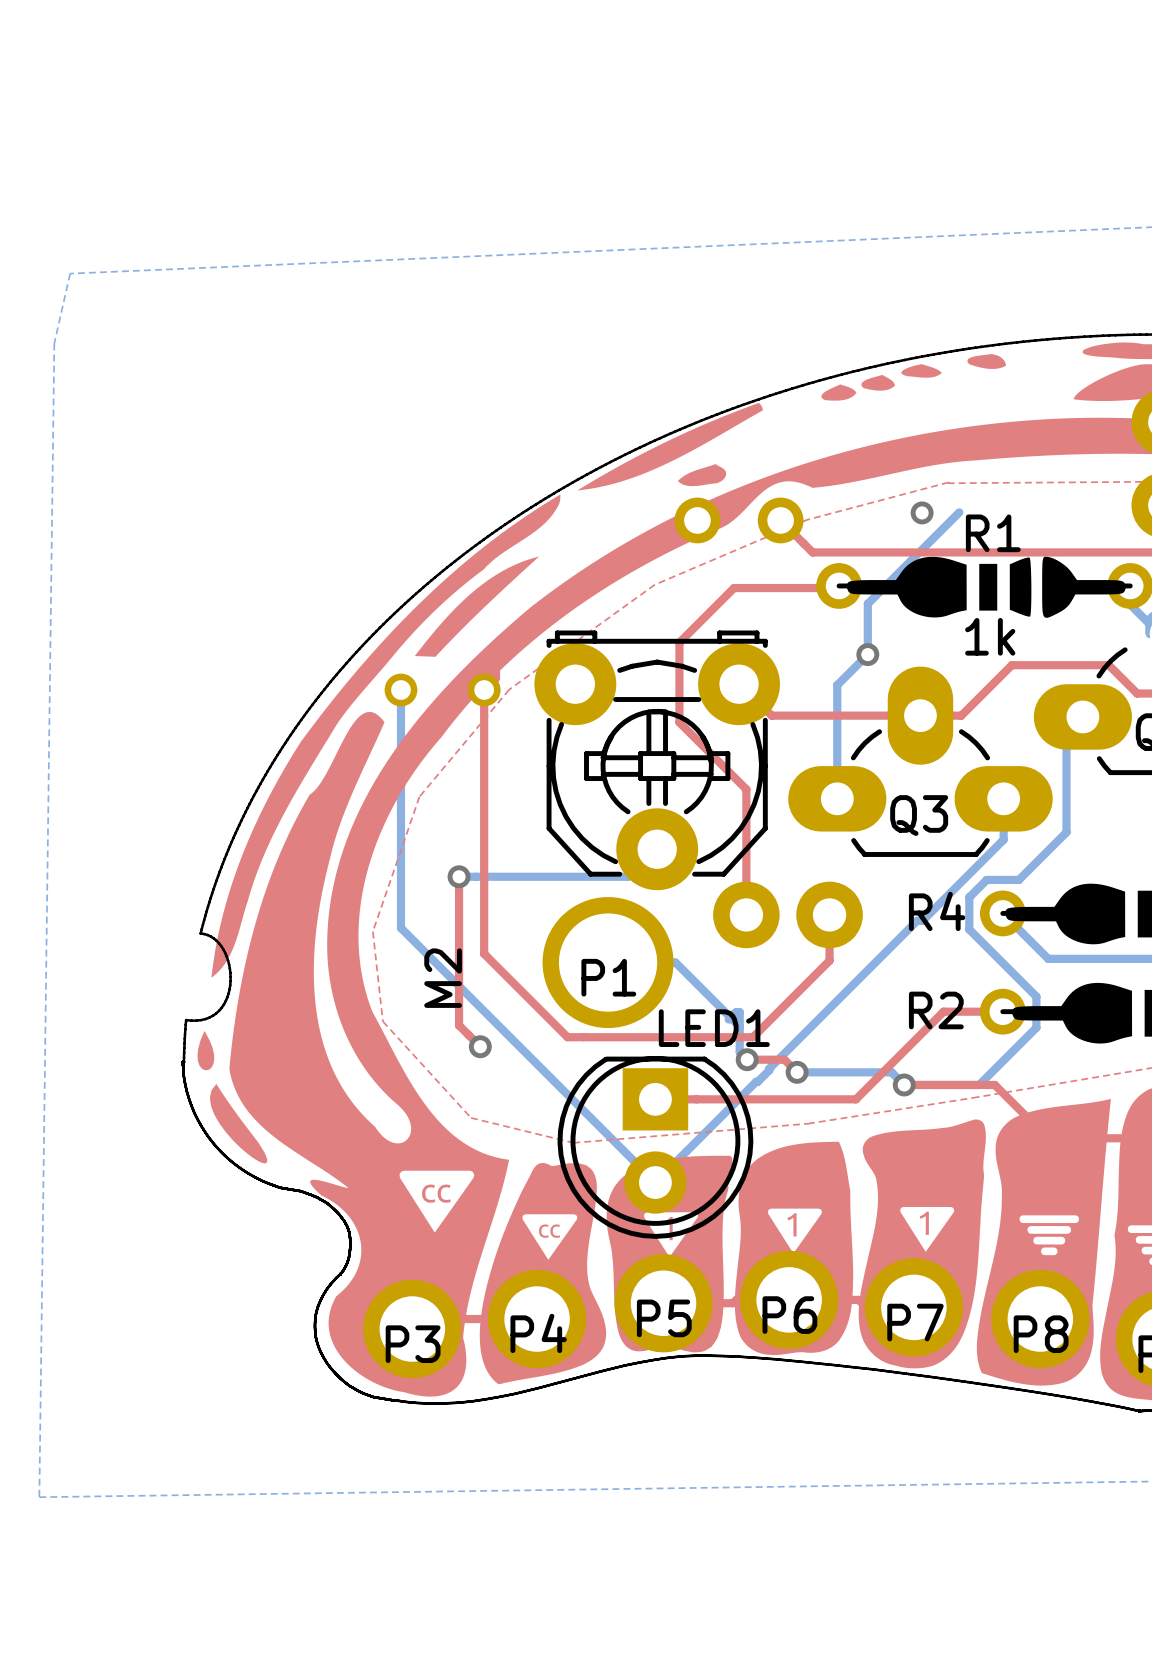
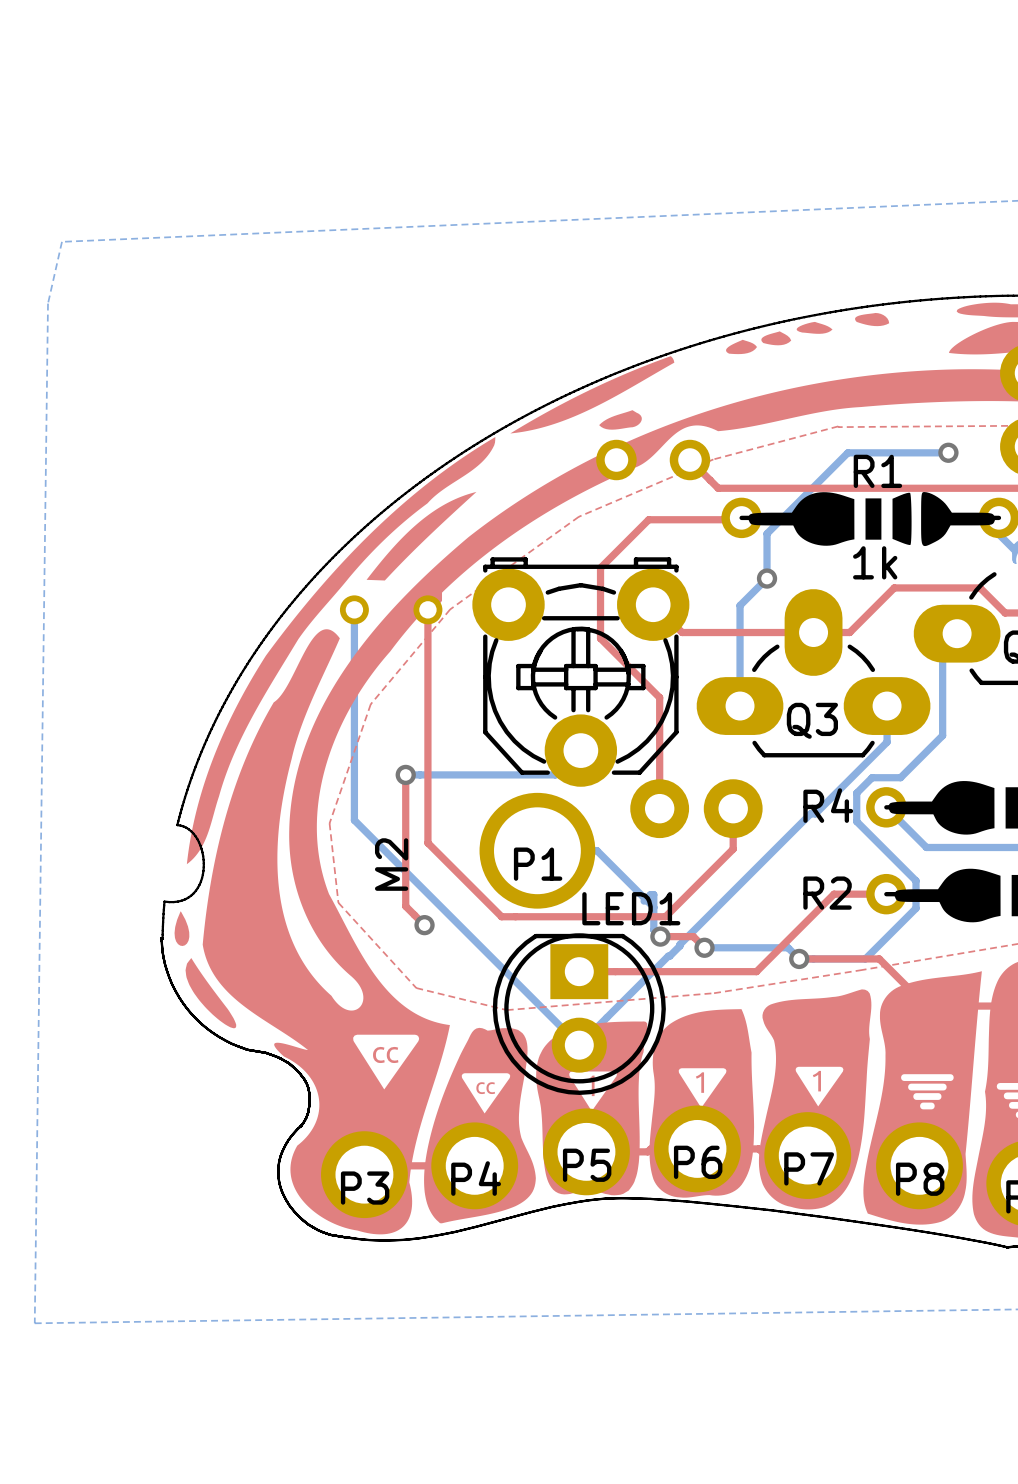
via position: (922, 512) -> (948, 452)
bottom track: none -> (847, 452) (948, 452)

